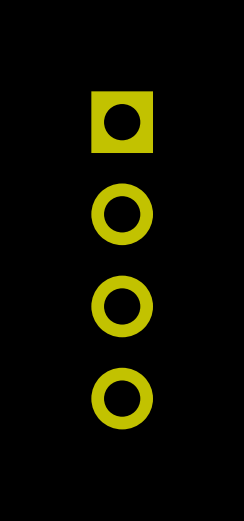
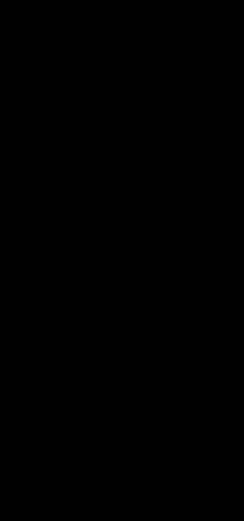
part: (122, 260) -> none

